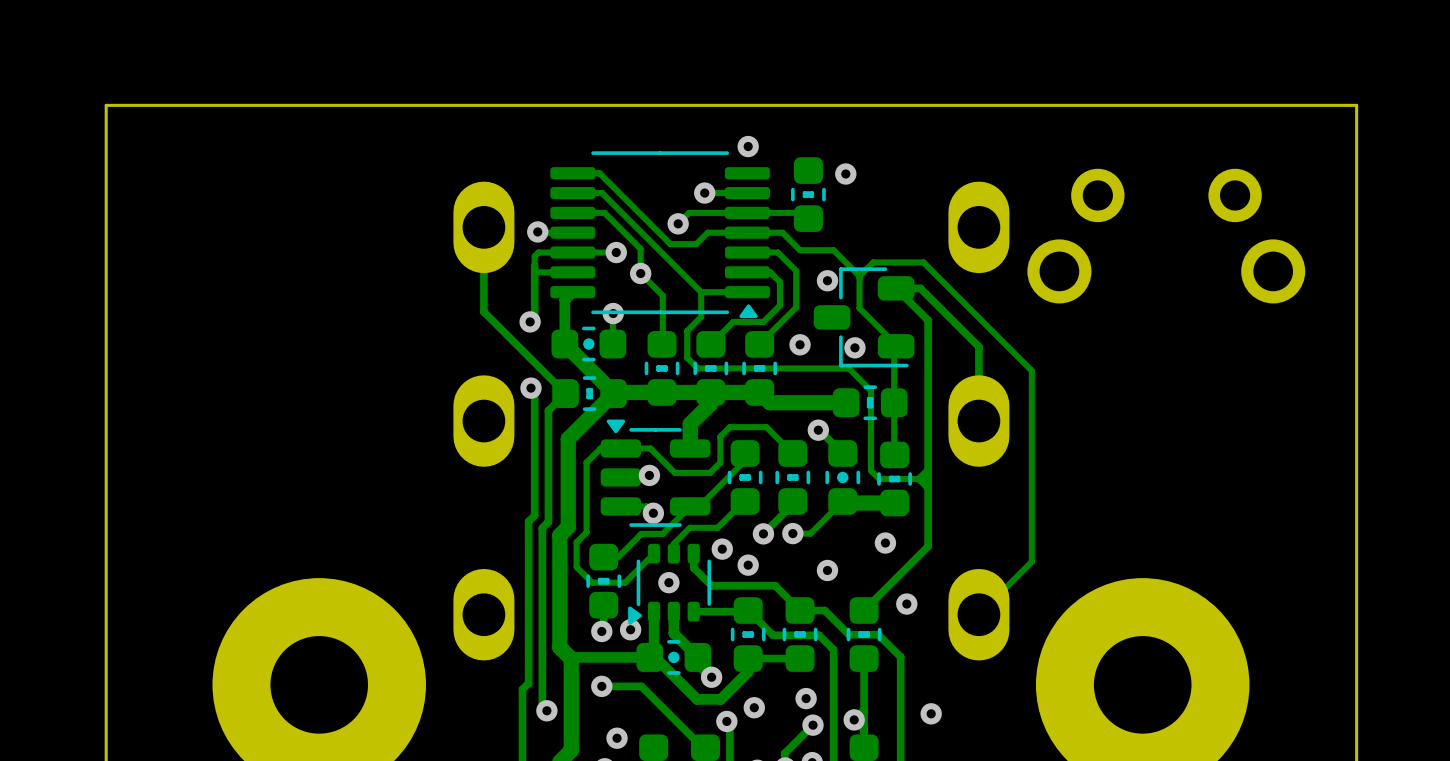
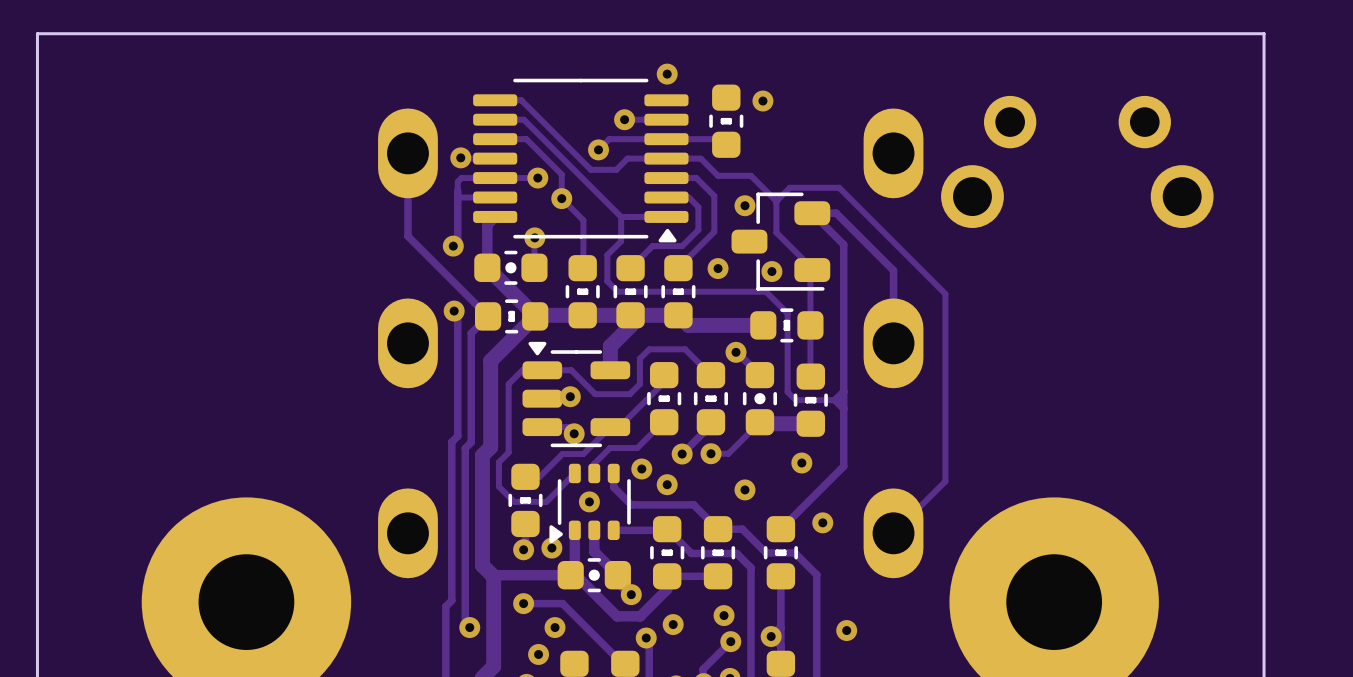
via: none -> (555, 627)

